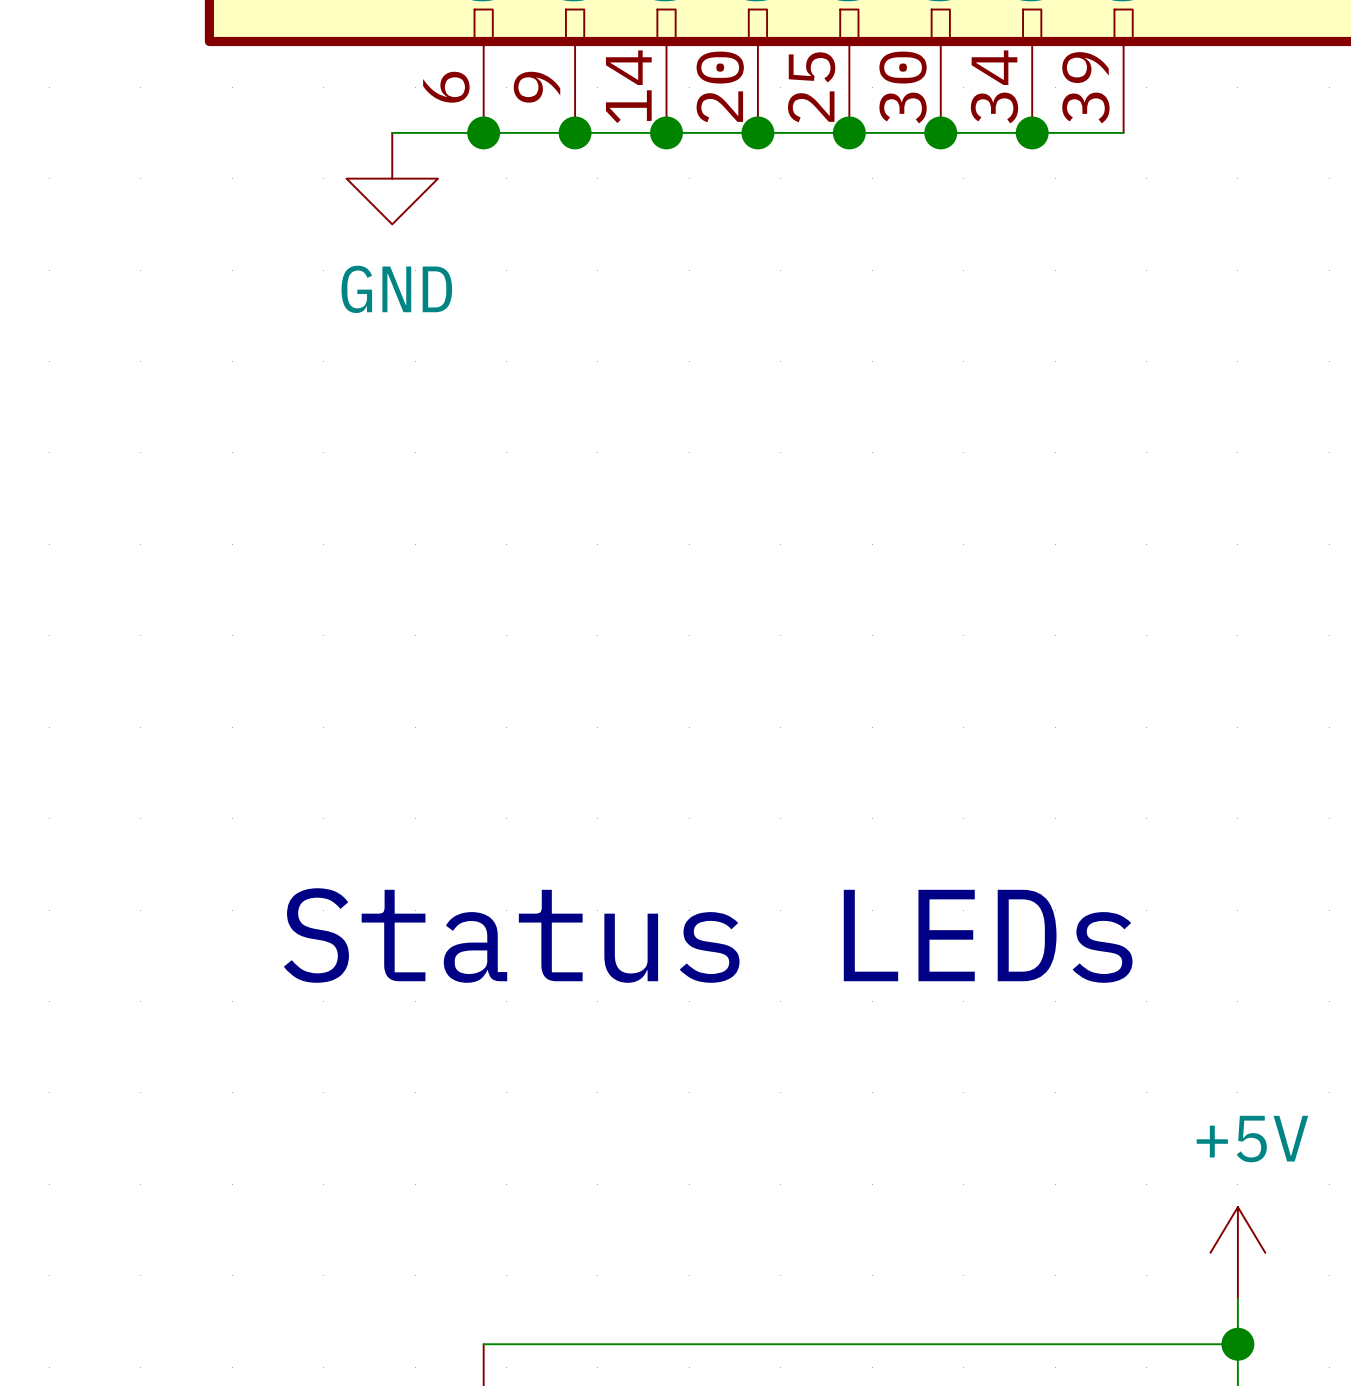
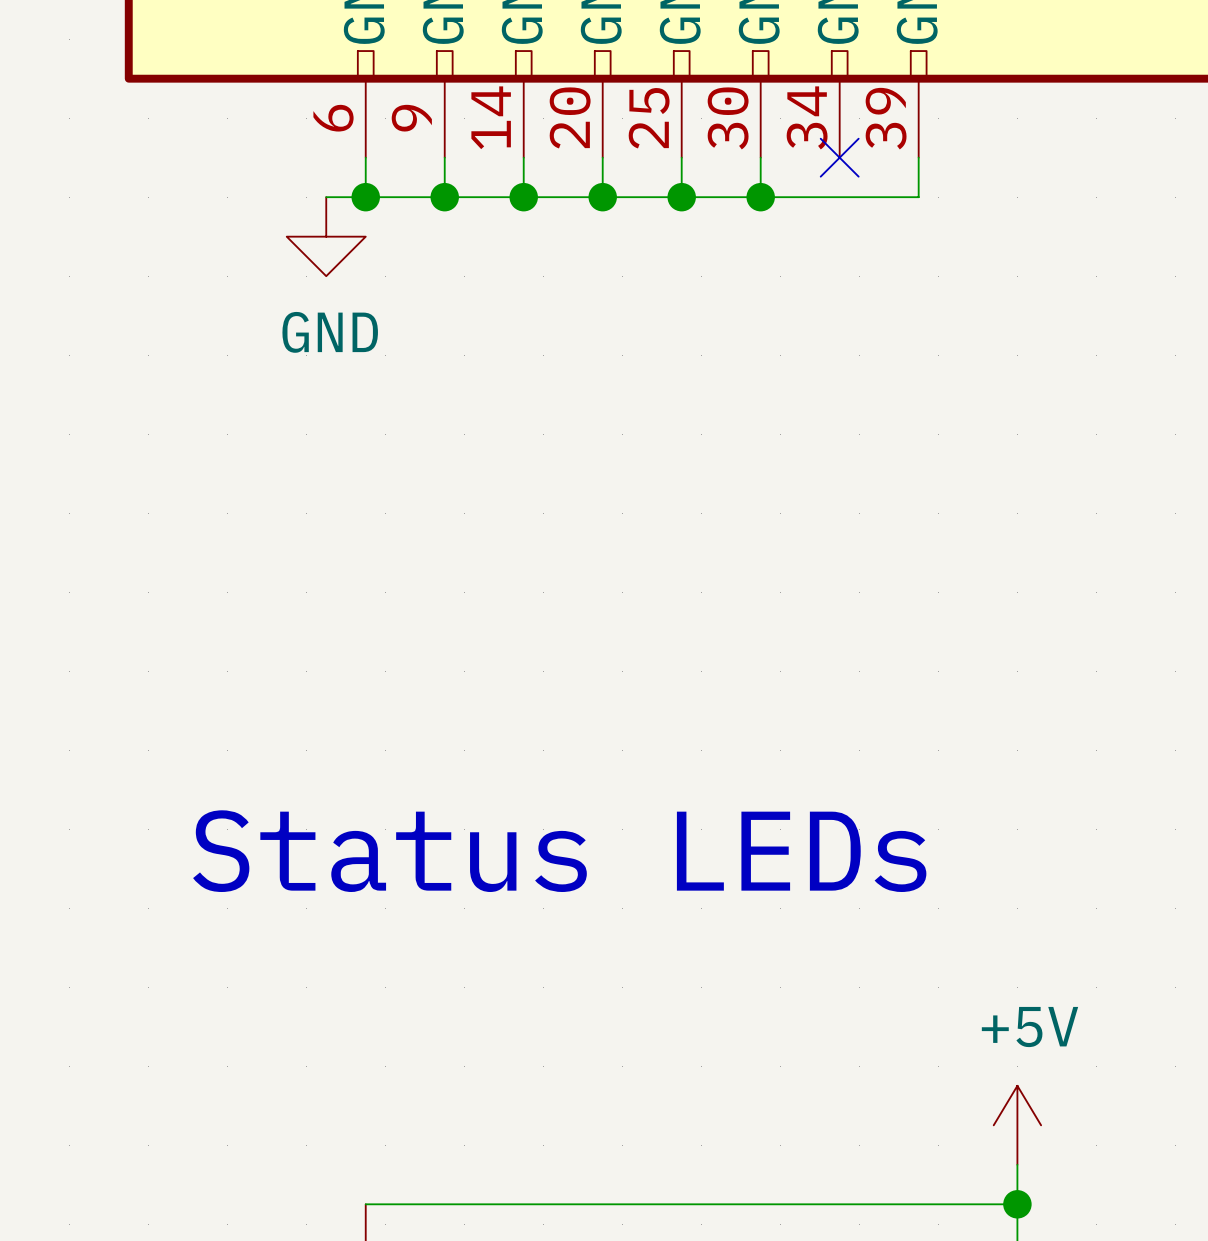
wire: (392, 132) (1123, 132) -> (326, 197) (918, 197) (918, 157)
wire: none -> (365, 157) (365, 197)
junction position: (483, 132) -> (365, 197)
wire: none -> (444, 157) (444, 197)
junction position: (575, 132) -> (444, 197)
wire: none -> (523, 157) (523, 197)
junction position: (666, 132) -> (523, 197)
wire: none -> (602, 157) (602, 197)
junction position: (757, 132) -> (602, 197)
wire: none -> (681, 157) (681, 197)
junction position: (849, 132) -> (681, 197)
wire: none -> (760, 157) (760, 197)
junction position: (940, 132) -> (760, 197)
junction: (1032, 132) -> none
no-connect mark: none -> (839, 157)
power symbol position: GND (392, 178) -> GND (326, 236)

